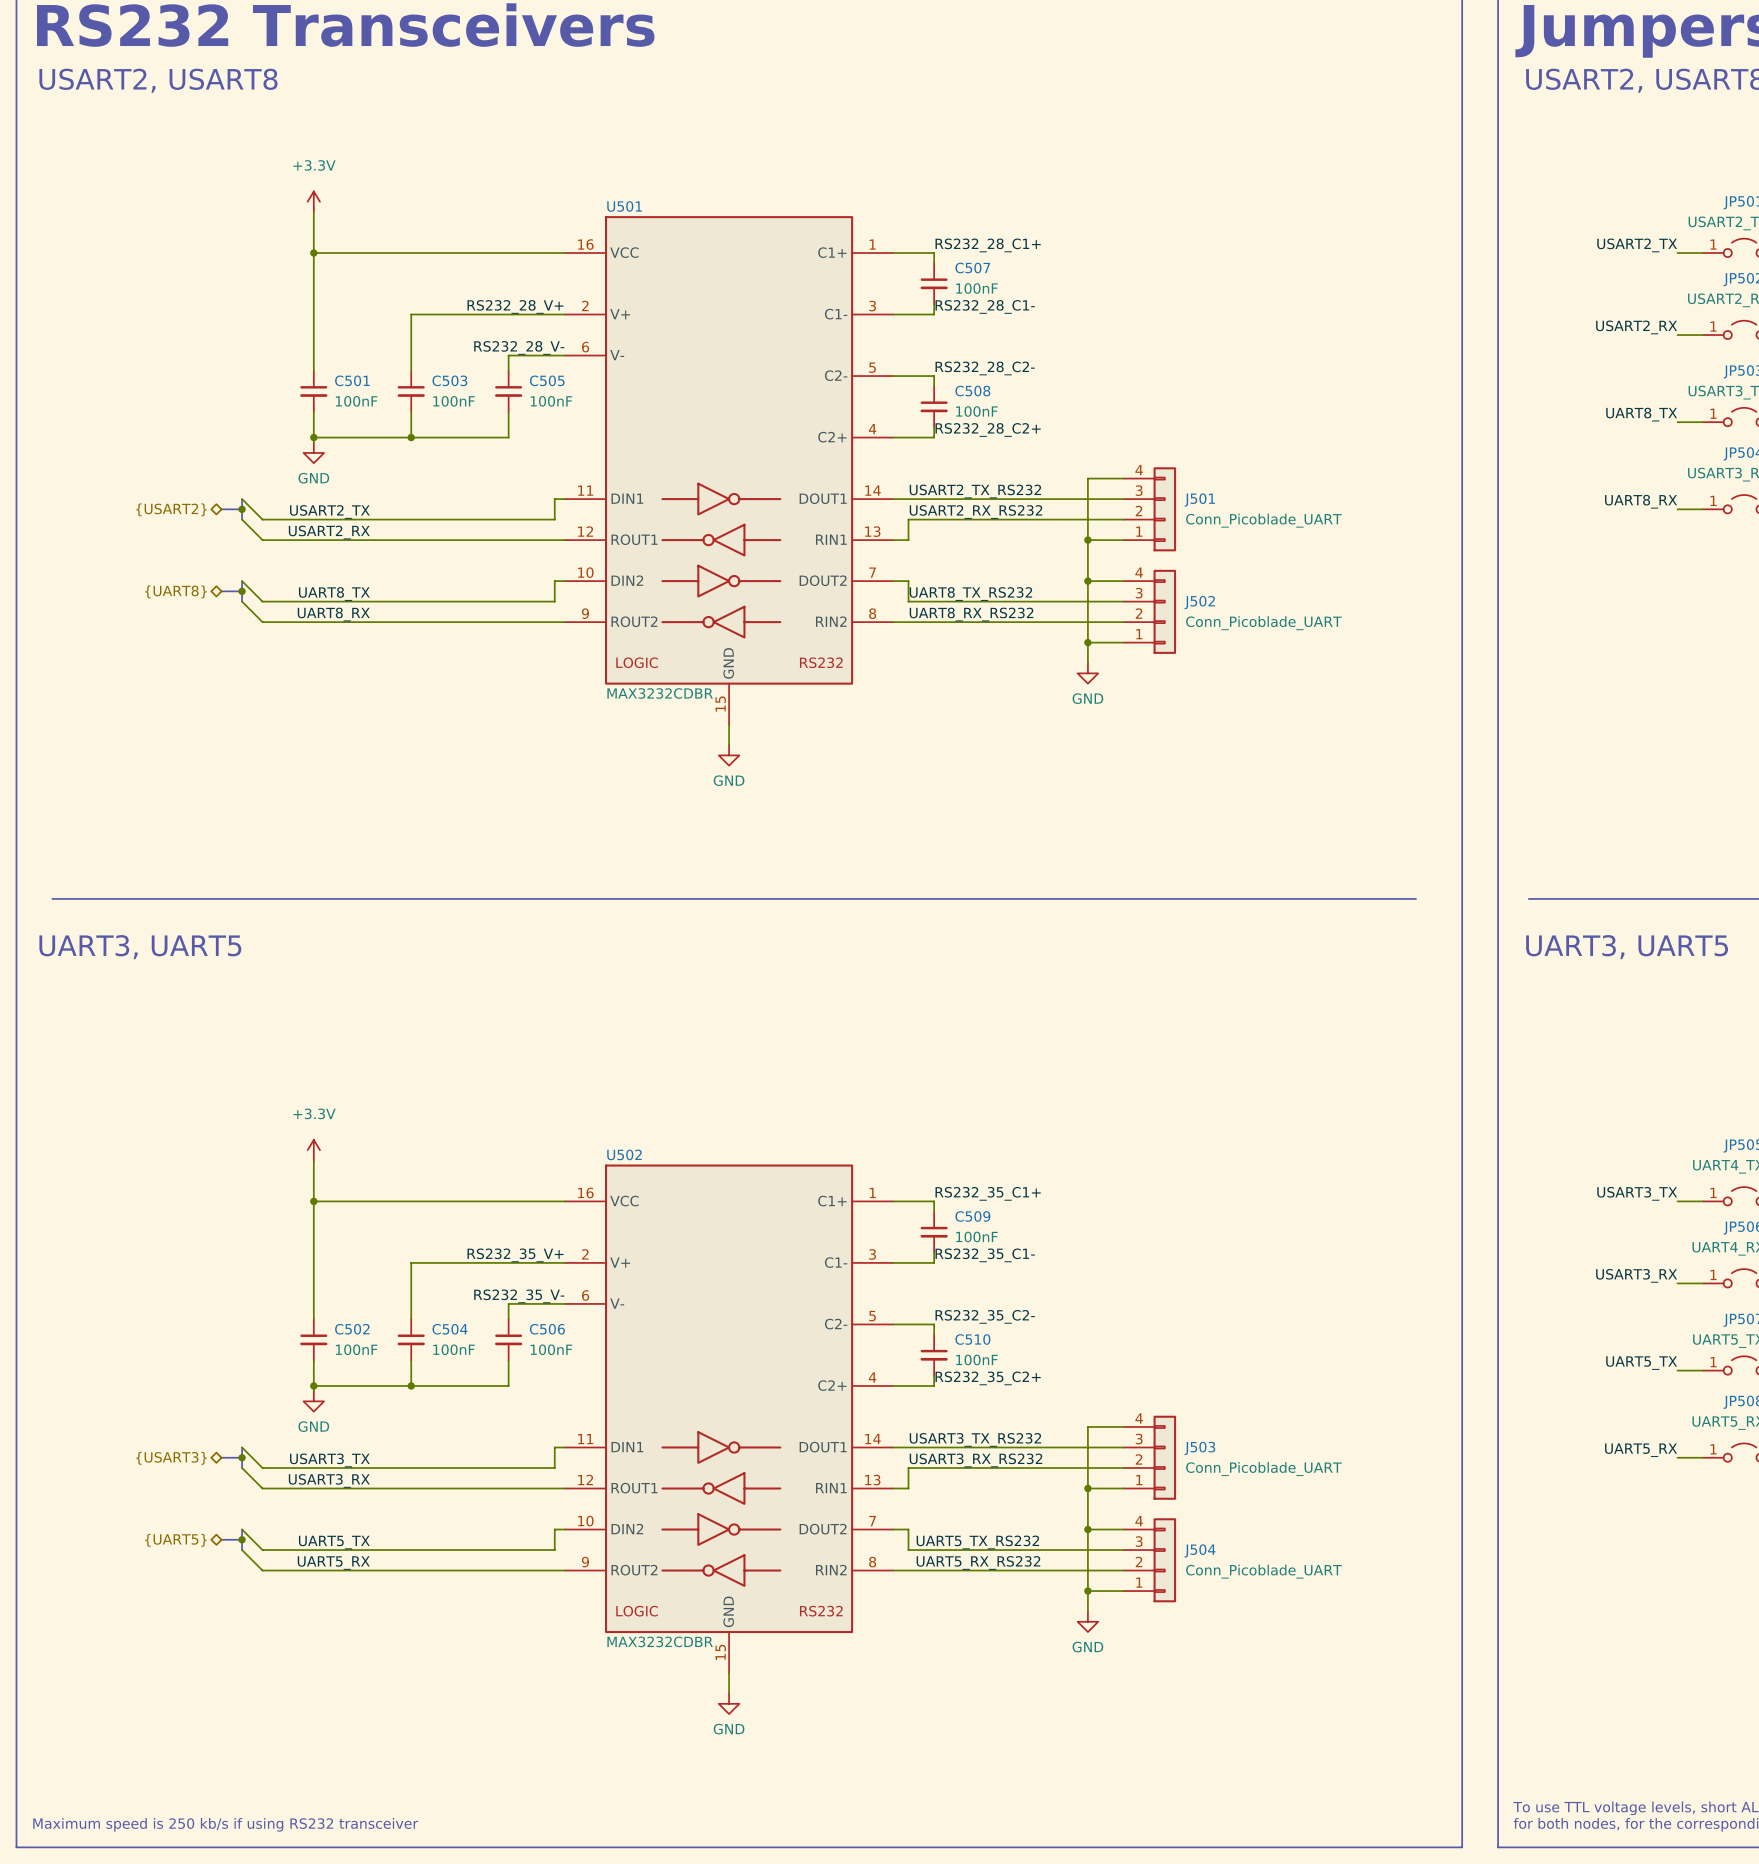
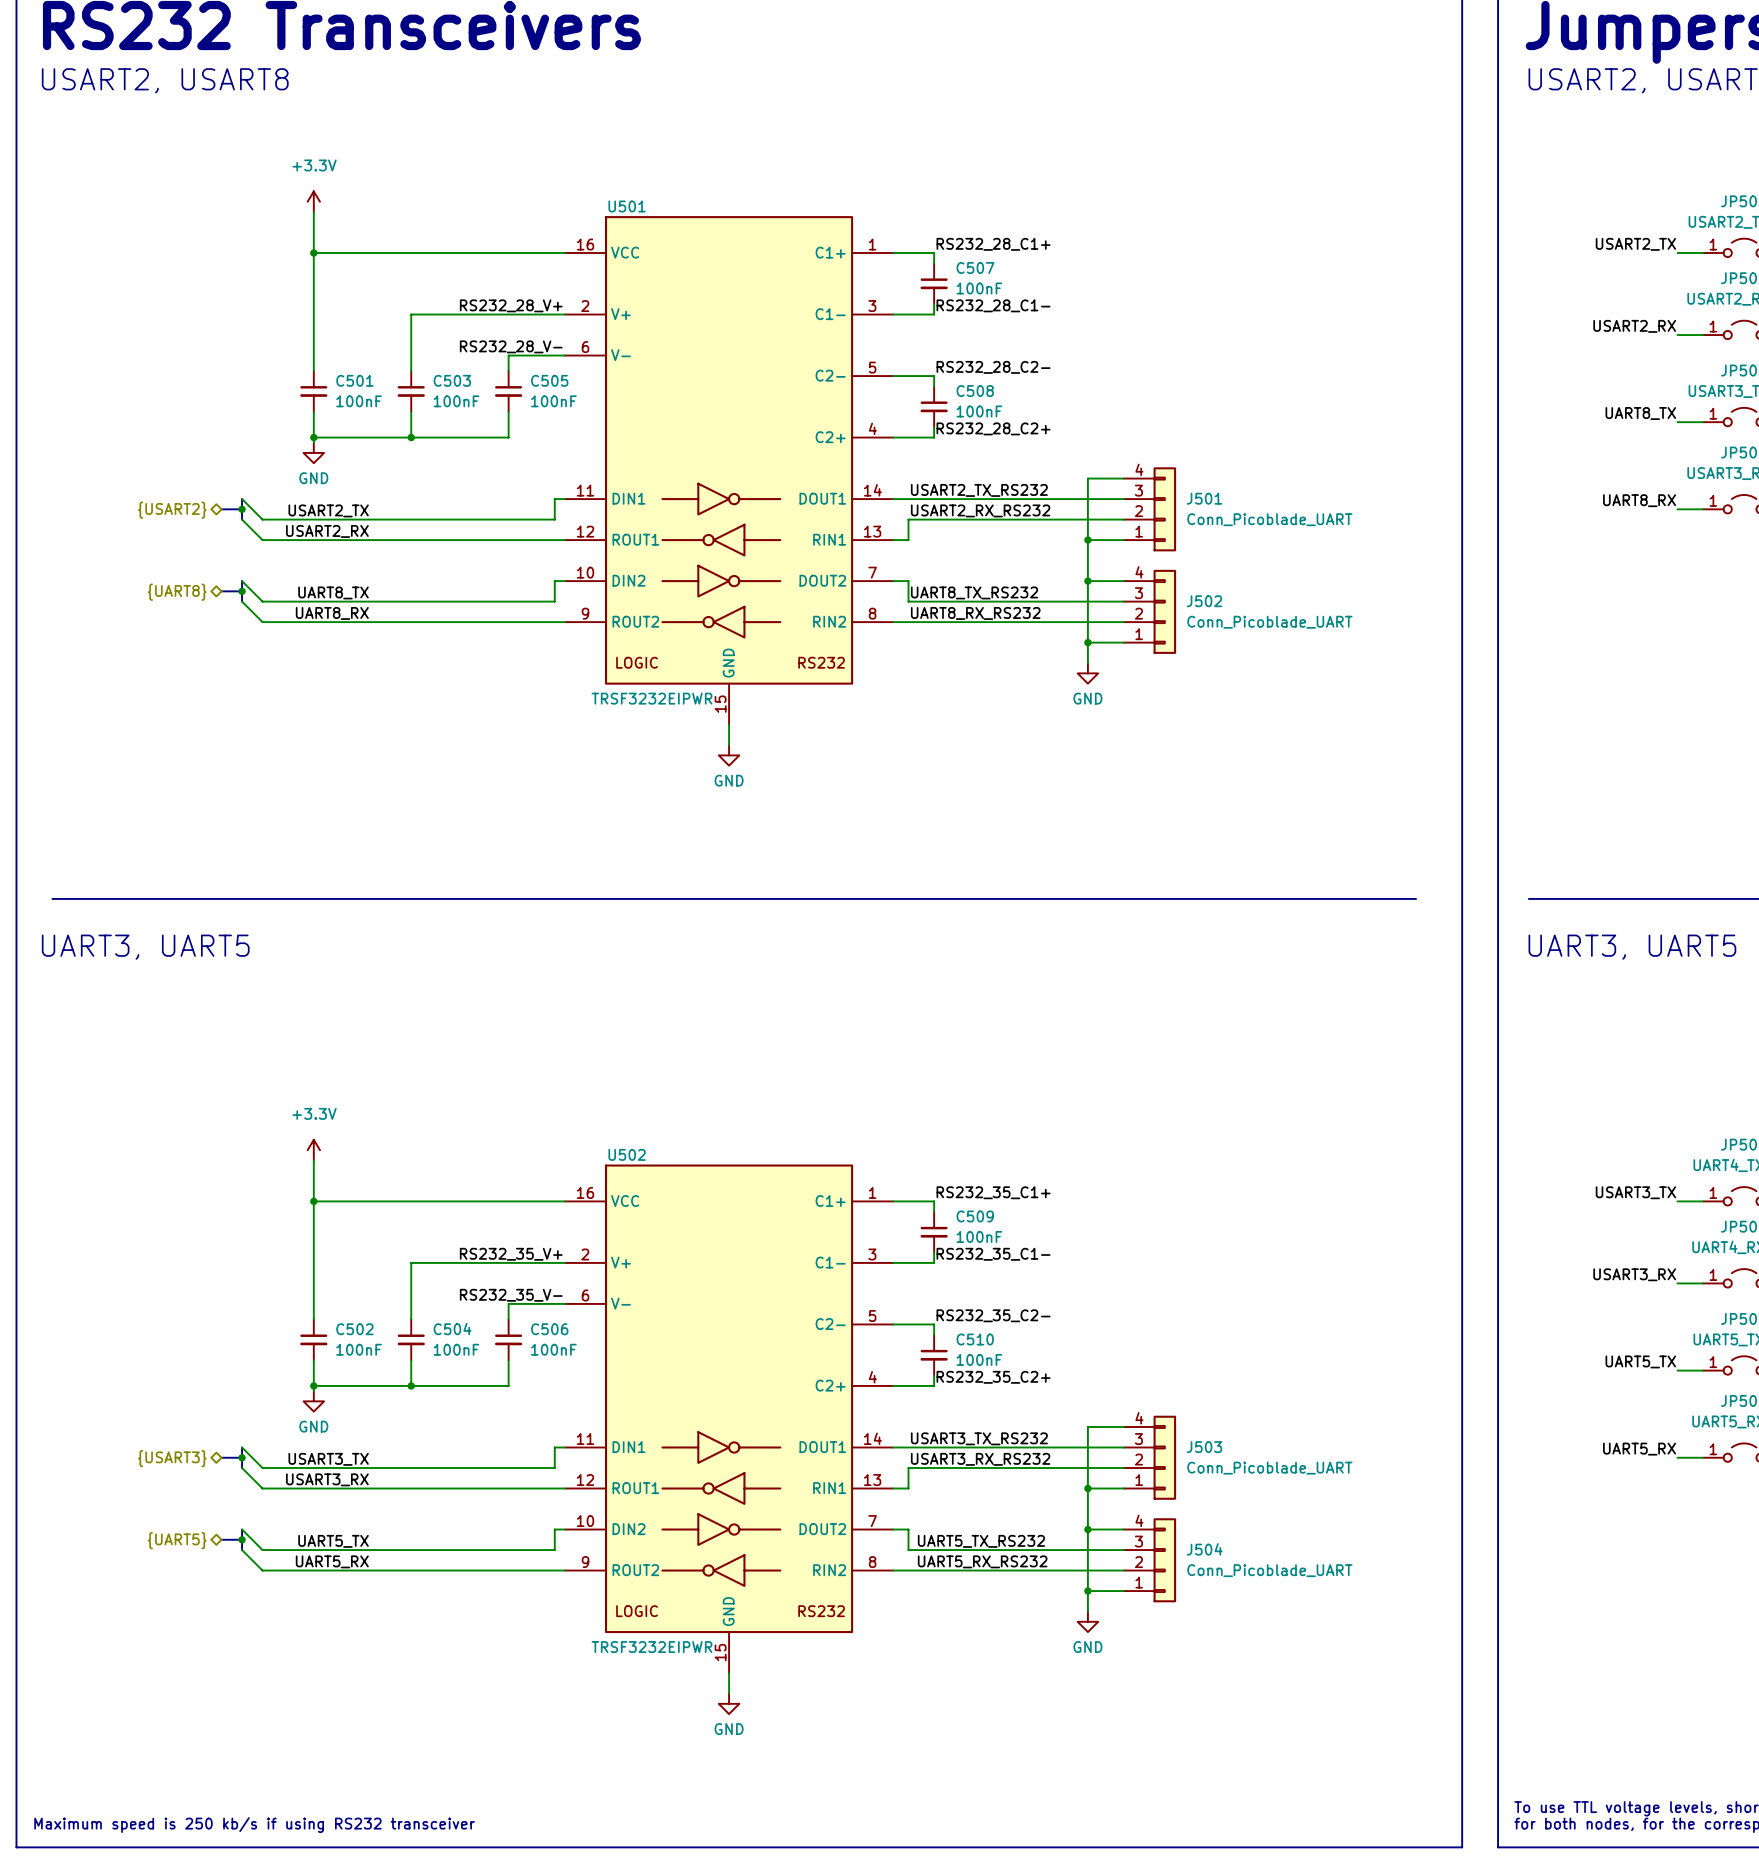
U501 value: MAX3232CDBR (660, 693) -> TRSF3232EIPWR (652, 698)
U502 value: MAX3232CDBR (660, 1641) -> TRSF3232EIPWR (652, 1647)

